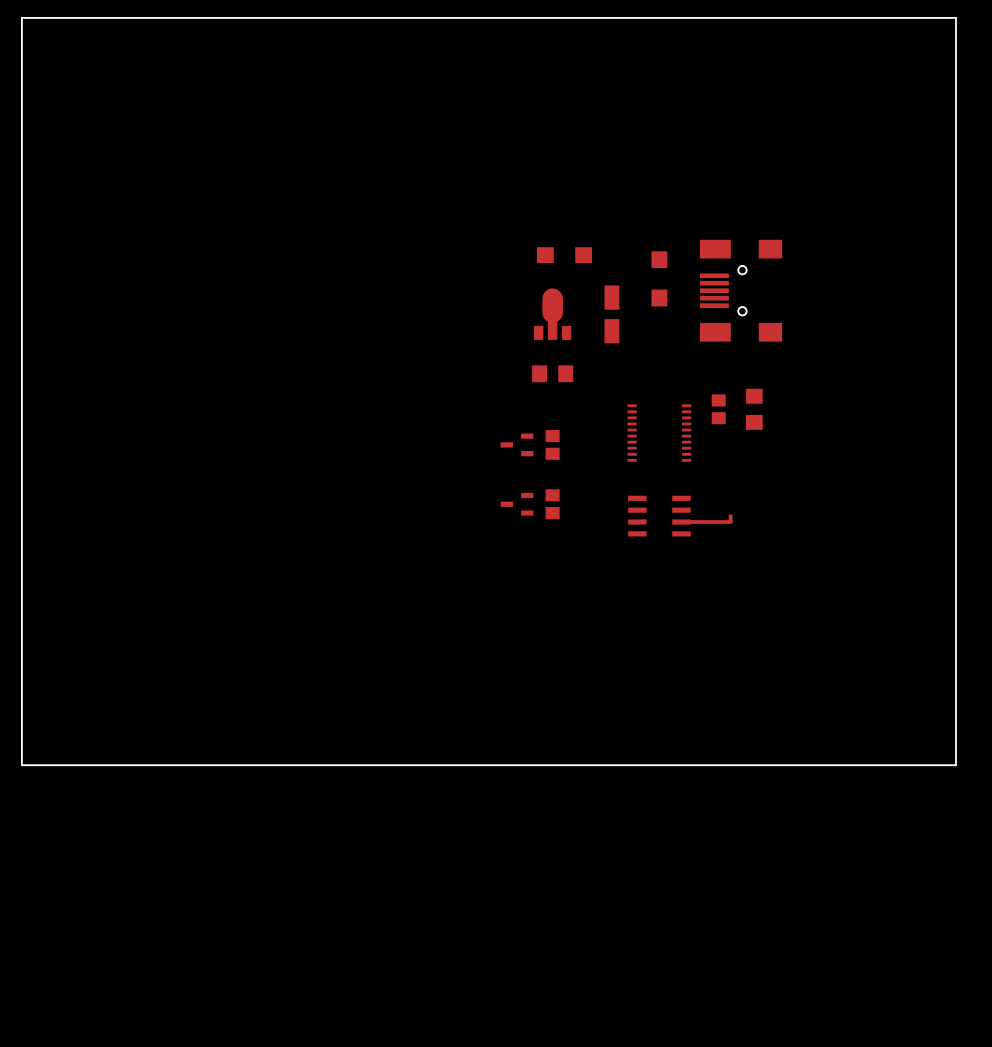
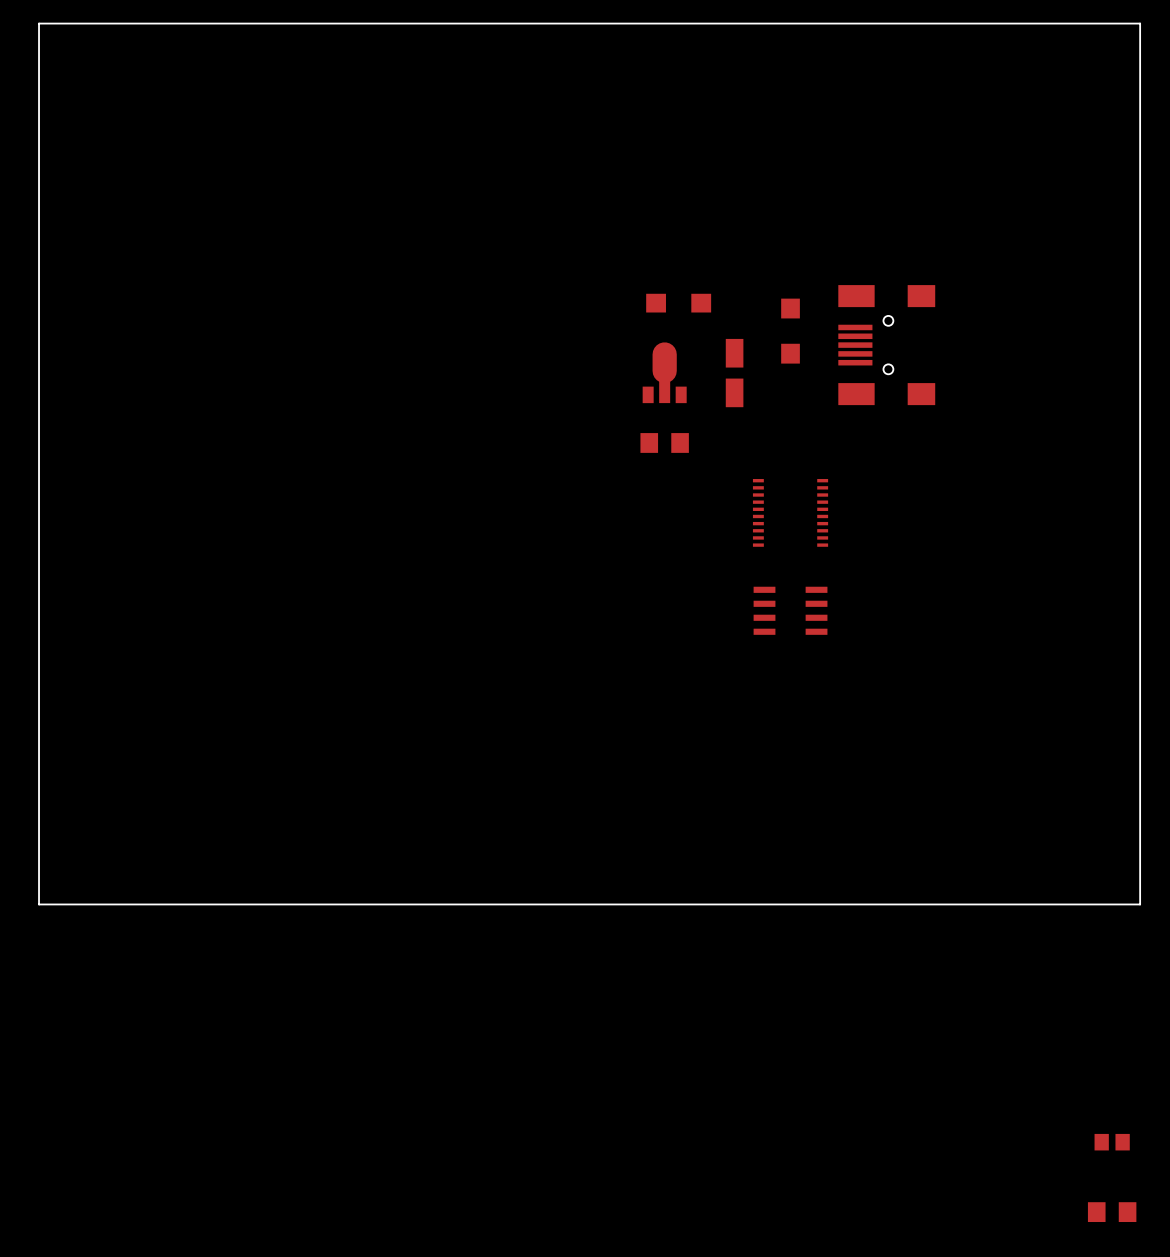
part: (718, 409) -> none
part: (754, 409) -> none
part: (517, 444) -> none
part: (552, 444) -> none
part: (517, 504) -> none
part: (552, 504) -> none
top track: (730, 516) (730, 522) (681, 522) -> none
part: none -> (1112, 1142)
part: none -> (1112, 1212)

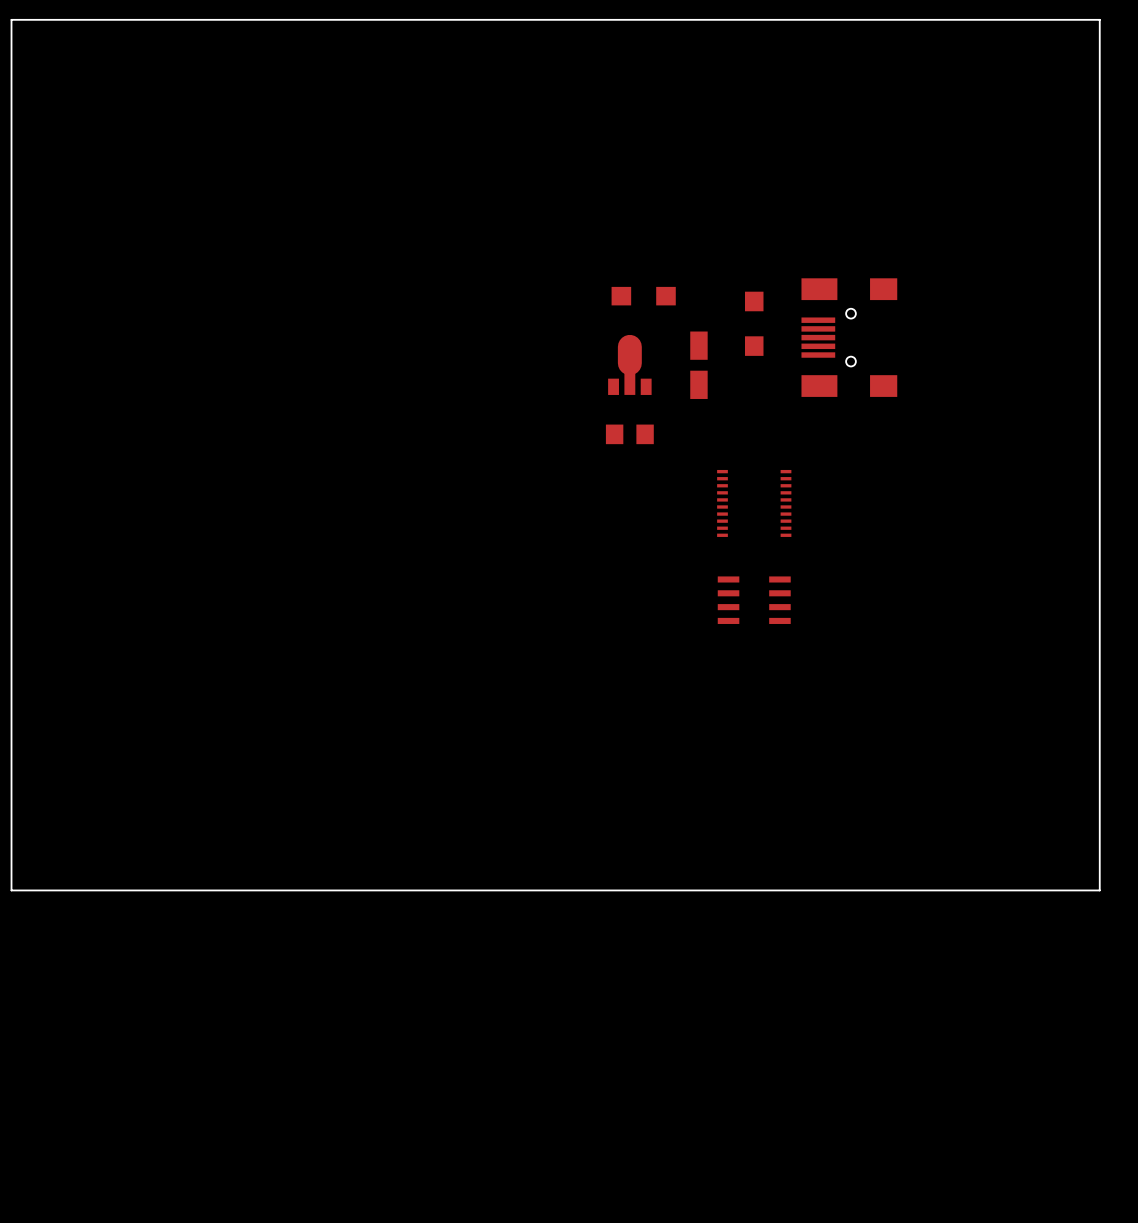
part: (1112, 1142) -> none
part: (1112, 1212) -> none

